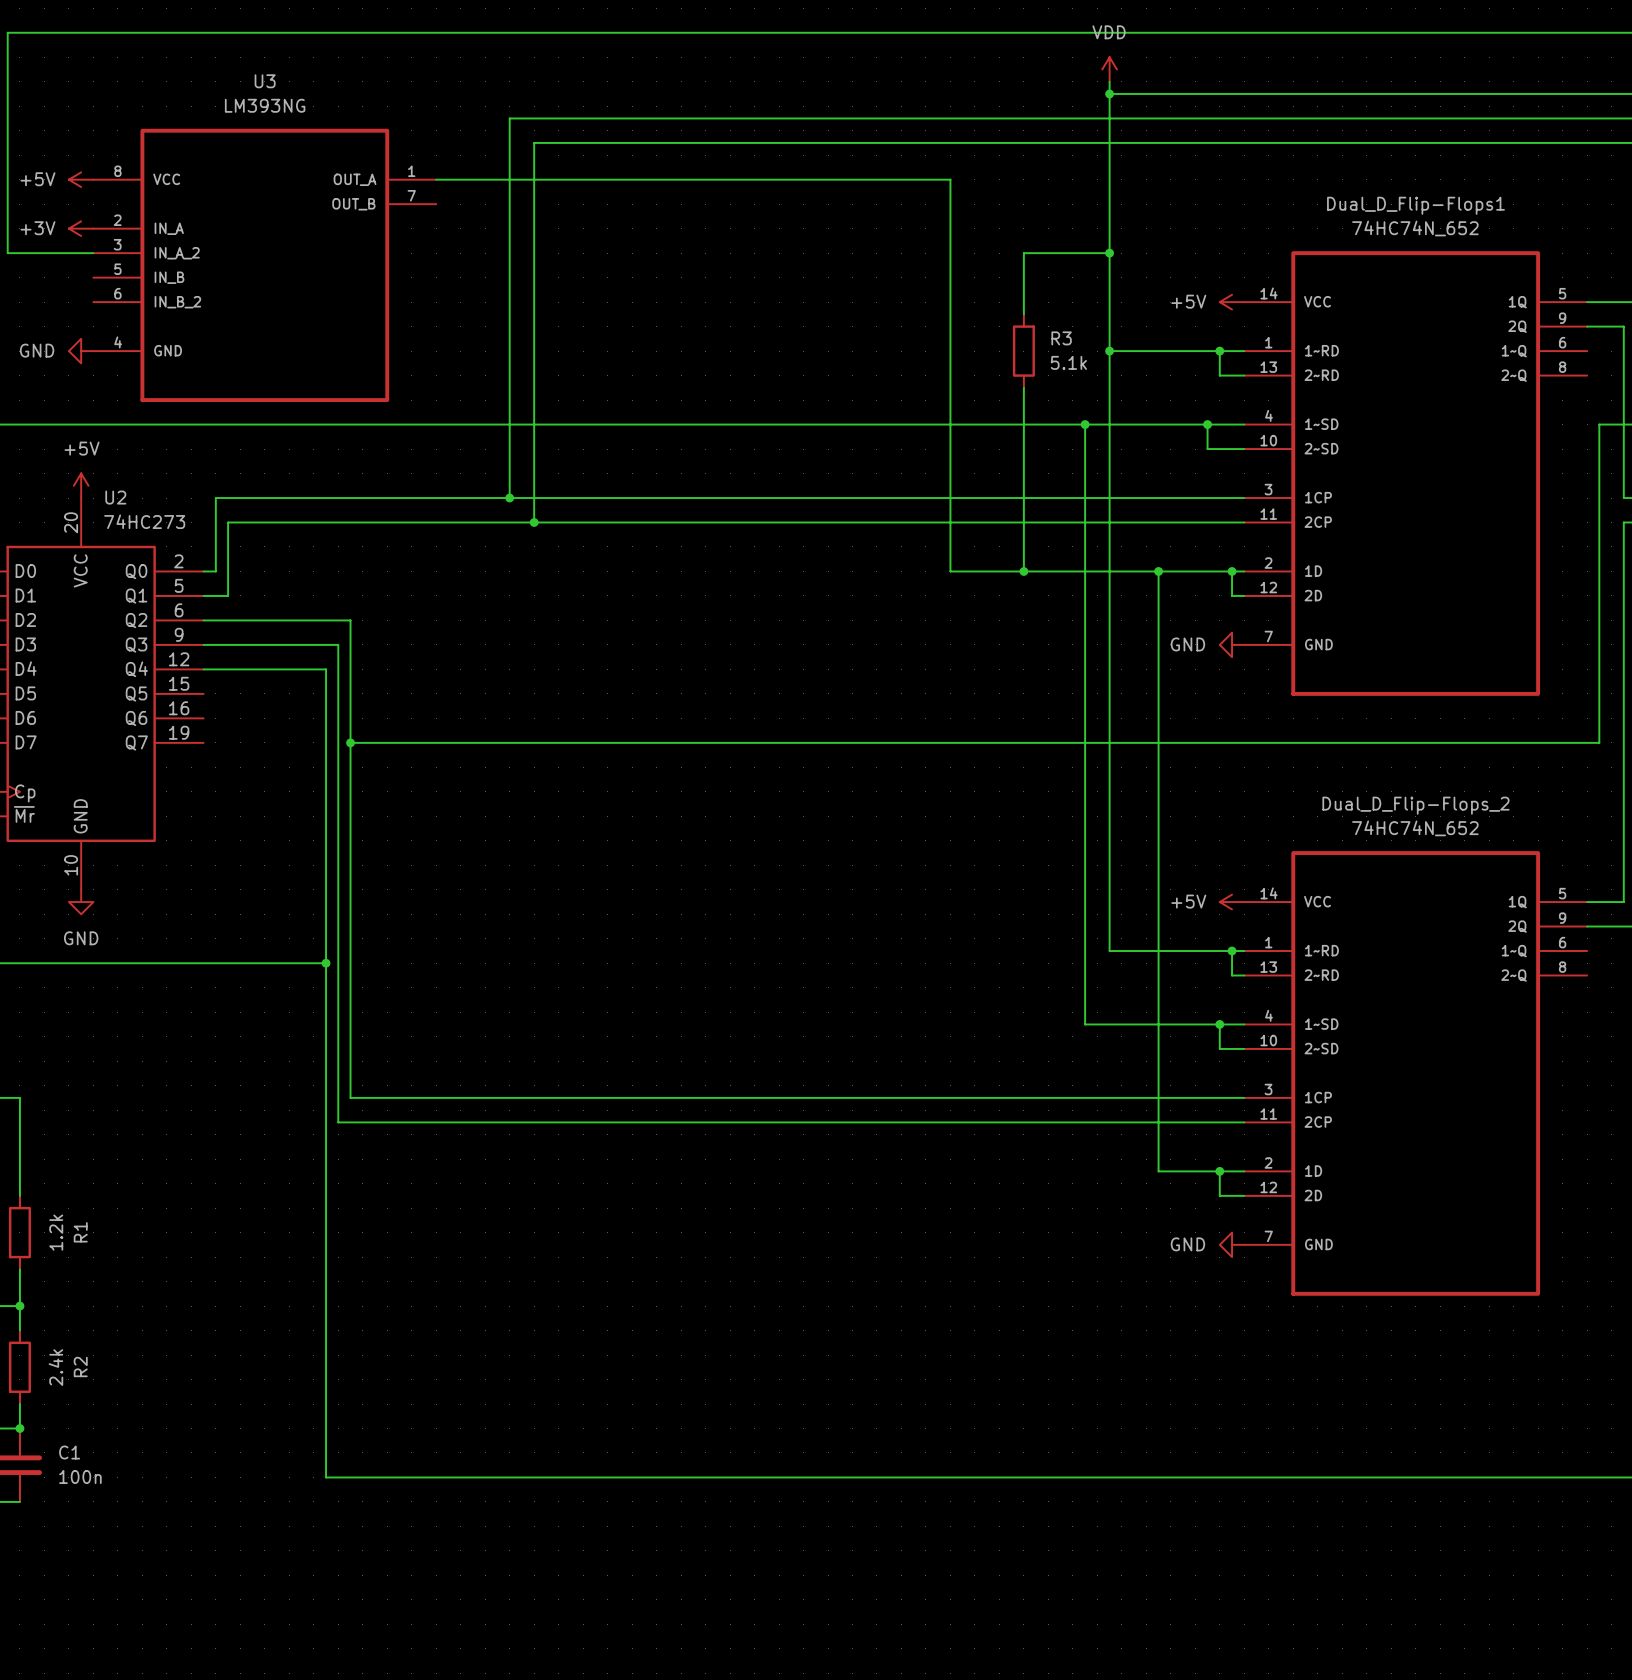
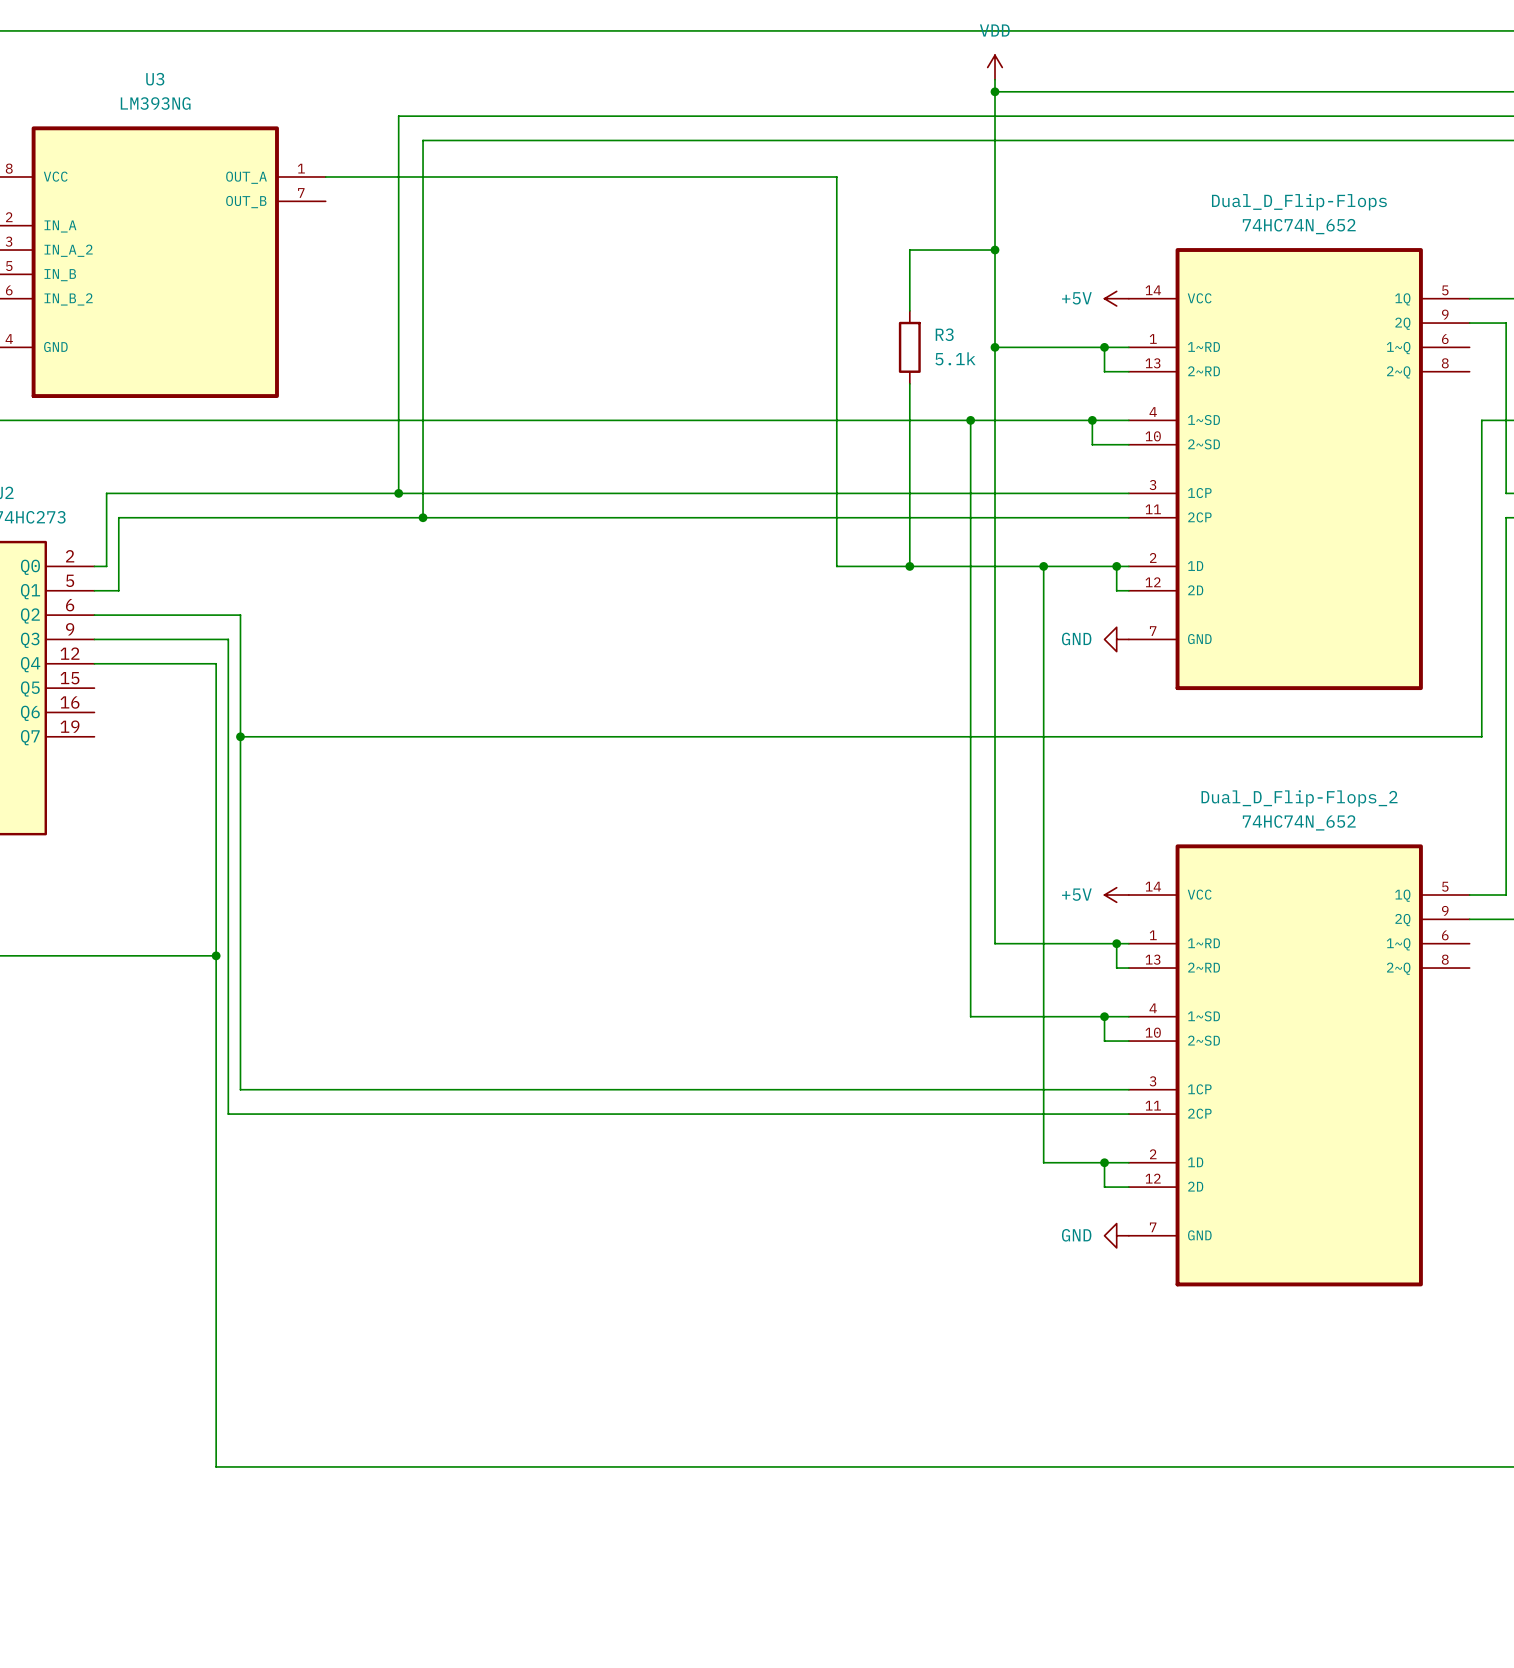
Dual_D_Flip-Flops1 name: Dual_D_Flip-Flops1 (1415, 205) -> Dual_D_Flip-Flops (1299, 202)

